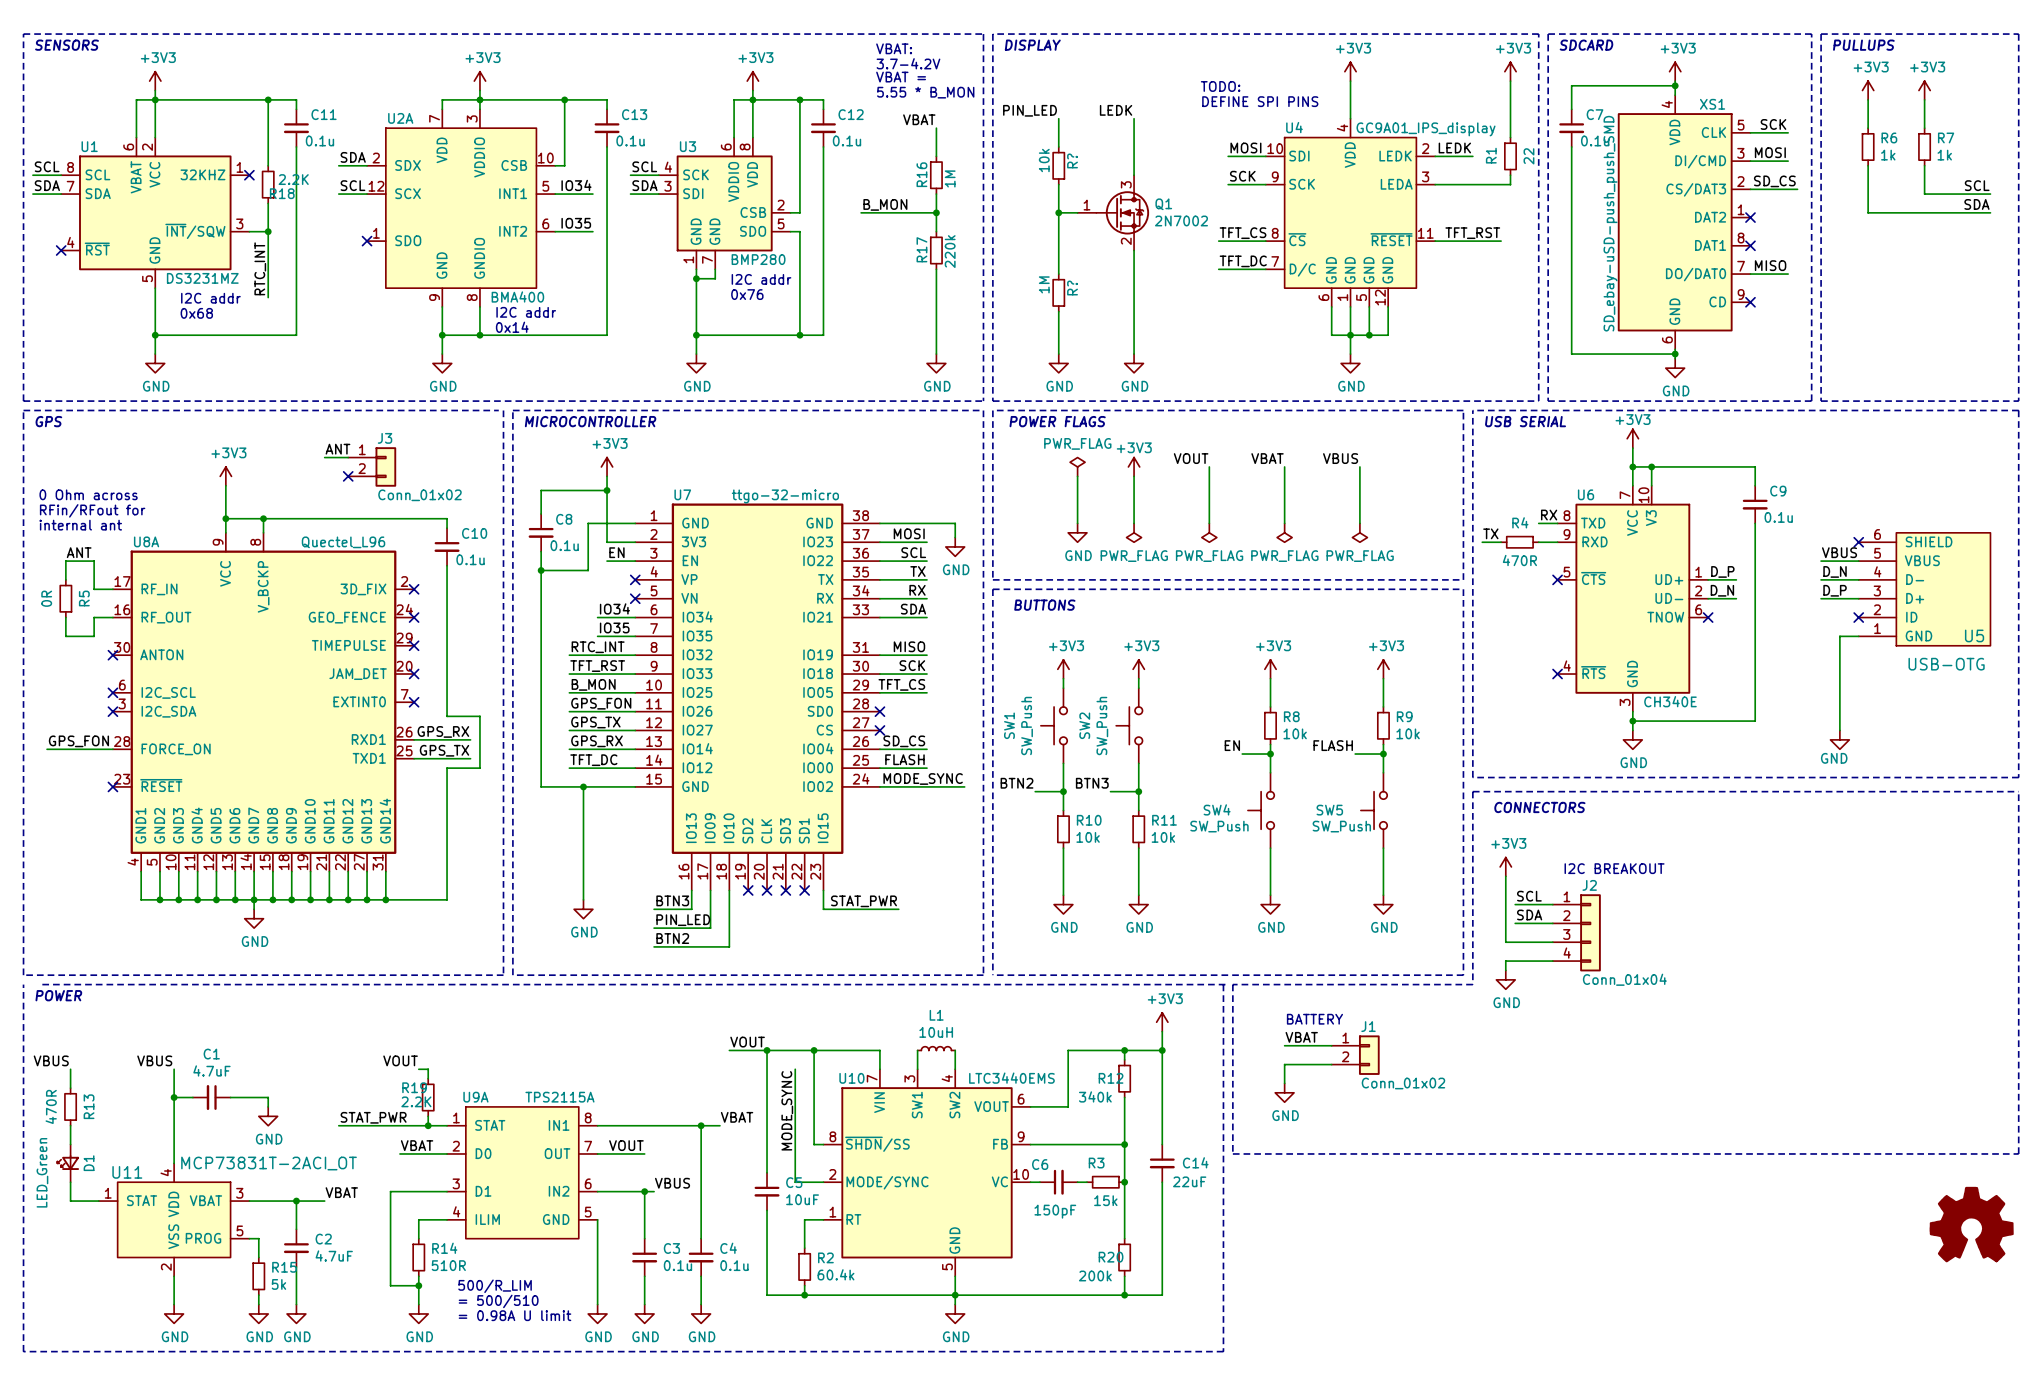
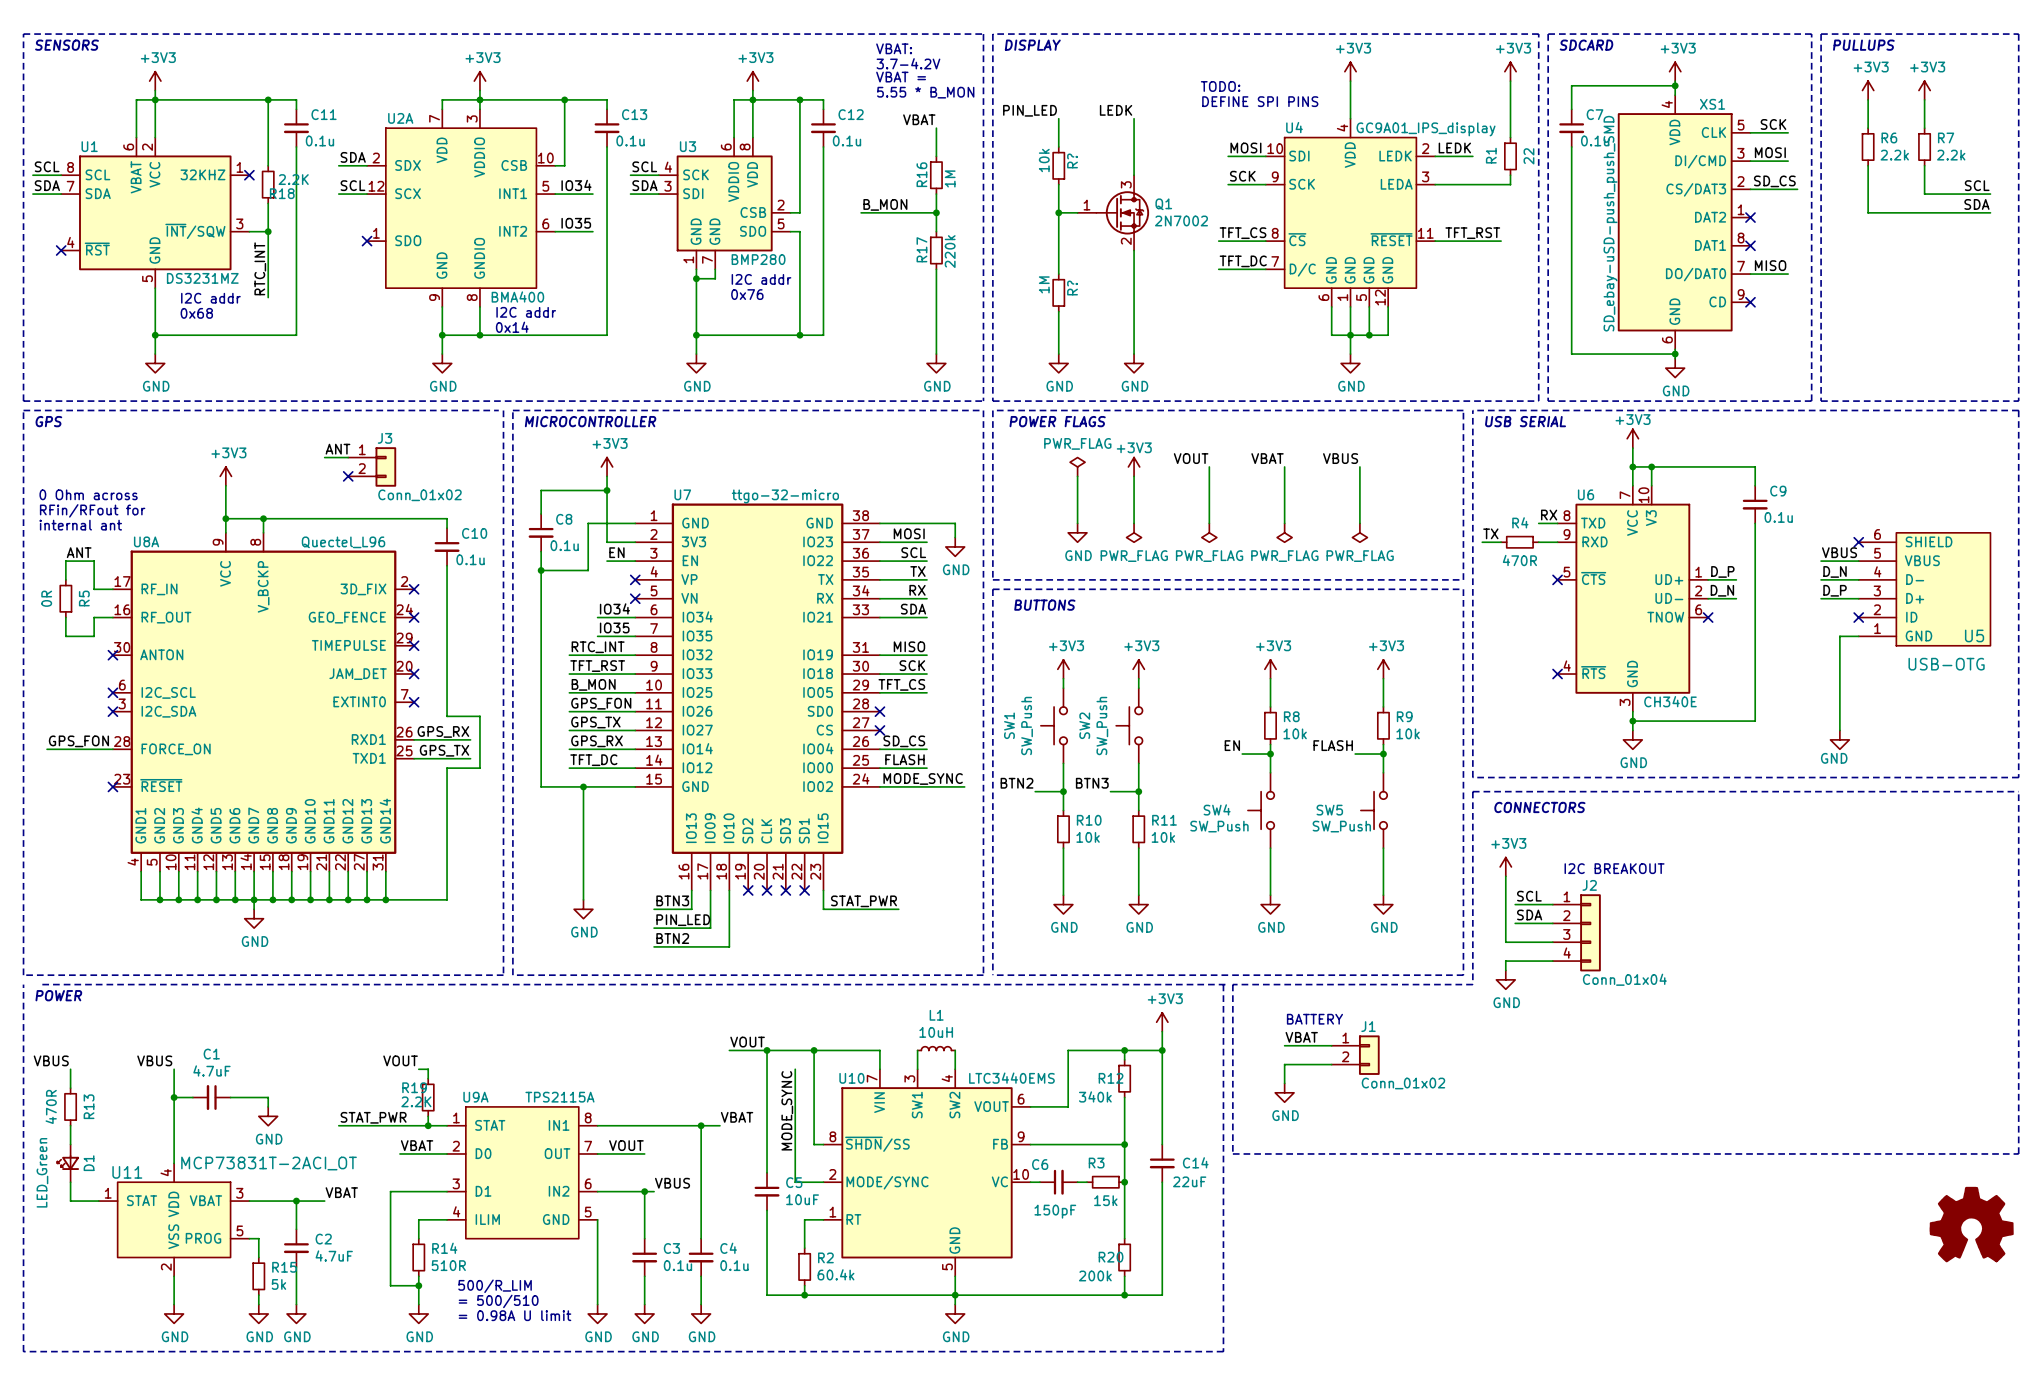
R6 value: 1k (1888, 155) -> 2.2k (1894, 155)
R7 value: 1k (1944, 155) -> 2.2k (1951, 155)

